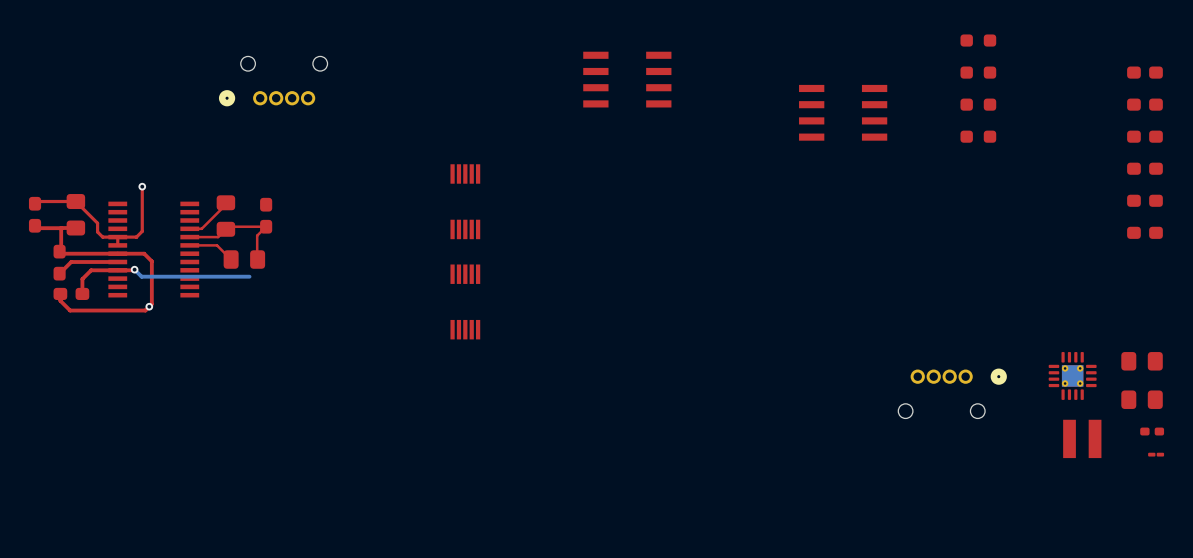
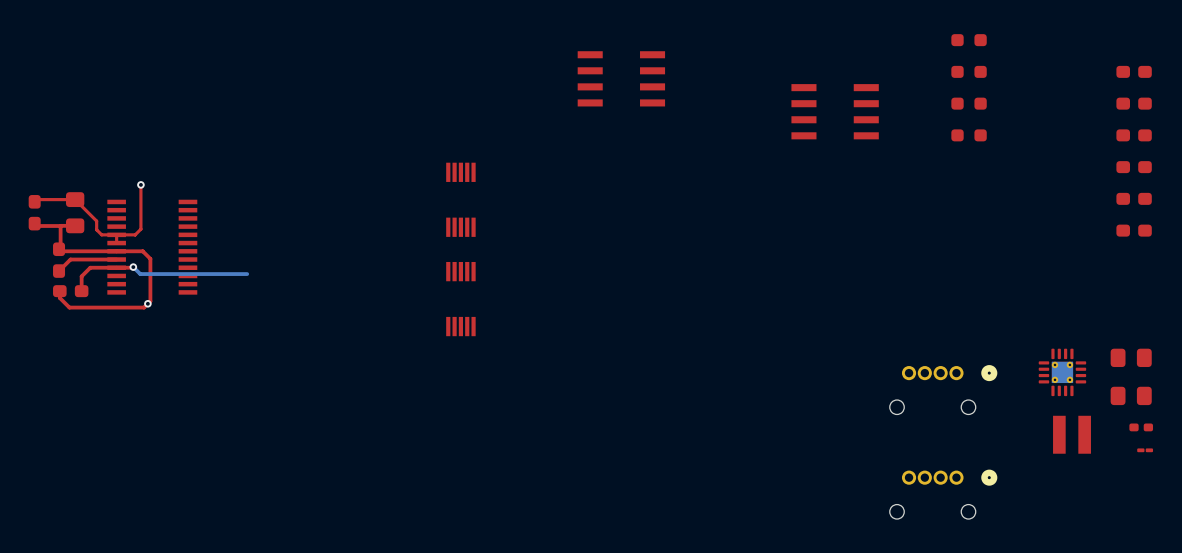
part: (273, 81) -> none
top track: (225, 202) (201, 228) (189, 228) -> none
part: (266, 215) -> none
part: (225, 216) -> none
top track: (189, 237) (218, 237) (229, 226) (266, 226) (257, 235) (257, 259) -> none
top track: (189, 245) (217, 245) (231, 259) -> none
part: (244, 259) -> none
part: none -> (943, 494)

